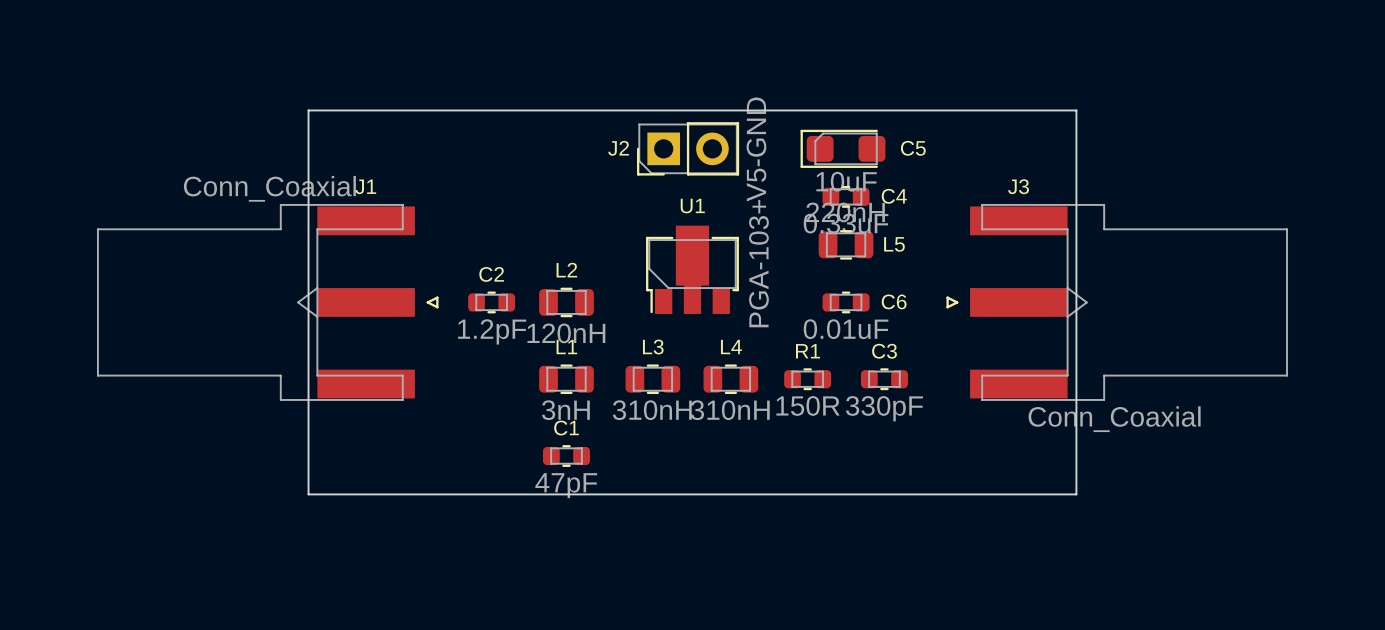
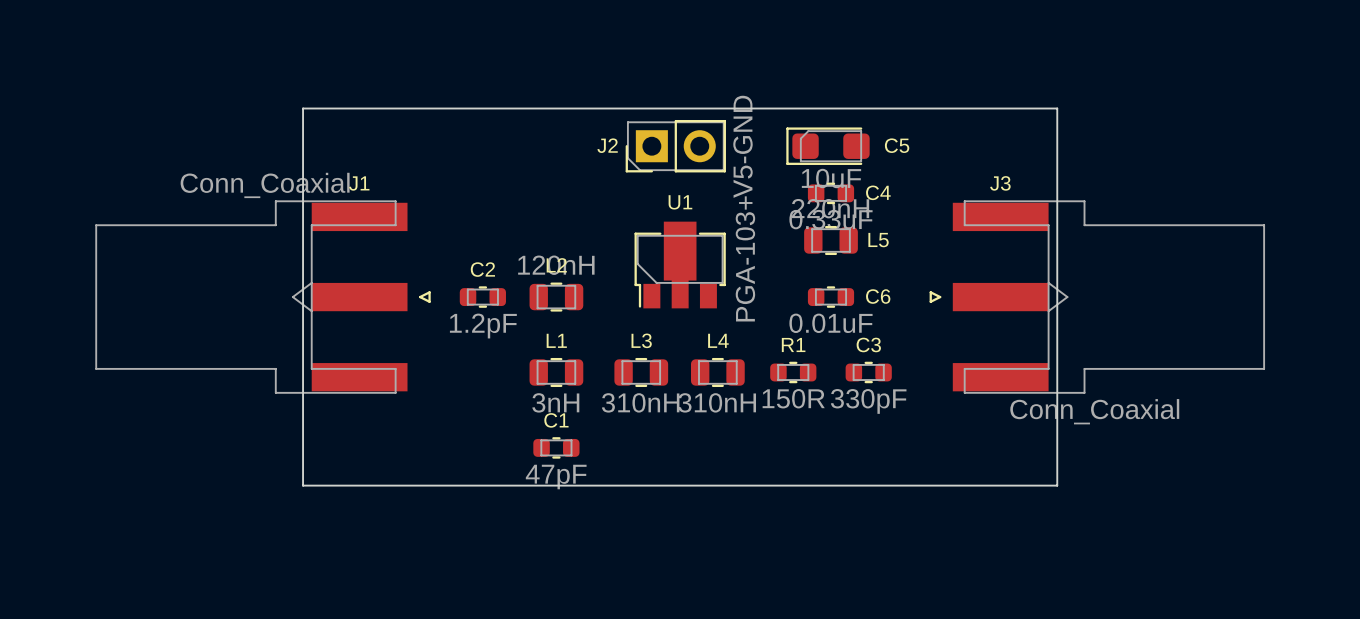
L2 value position: 120nH (566, 333) -> 120nH (556, 265)

